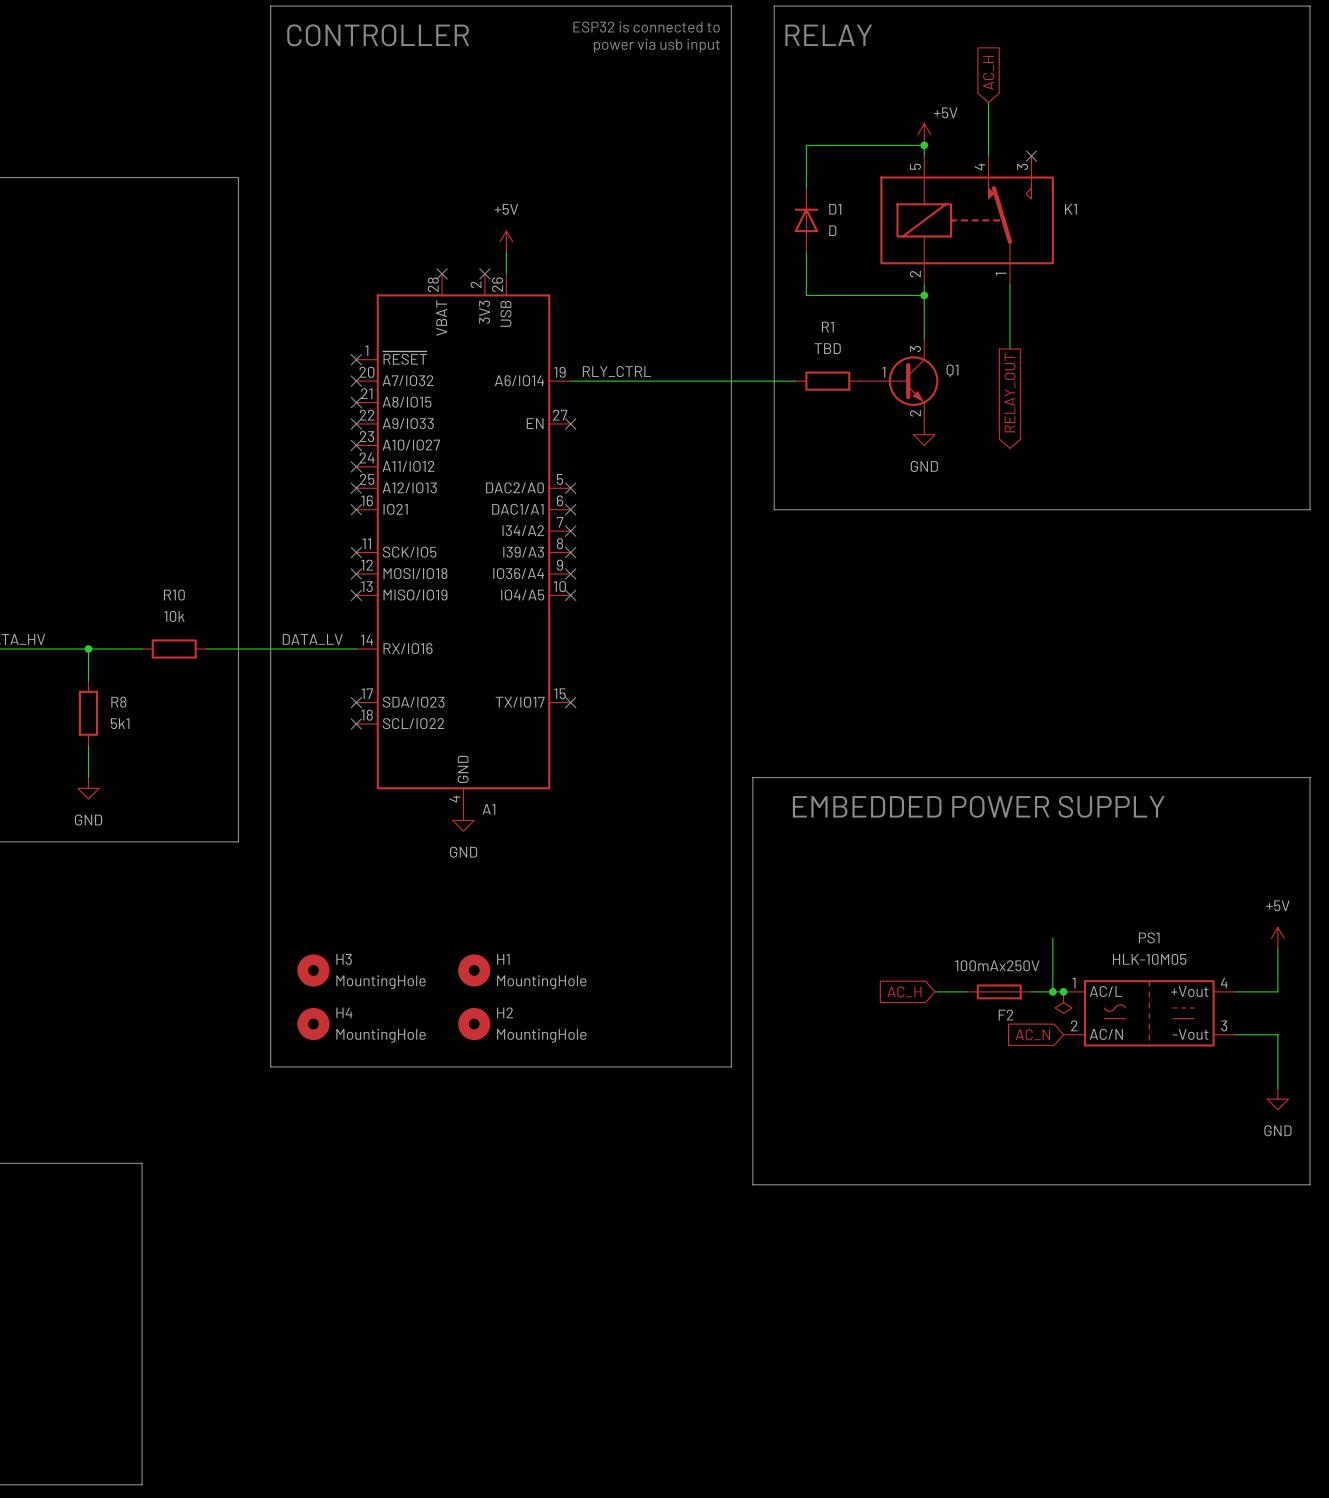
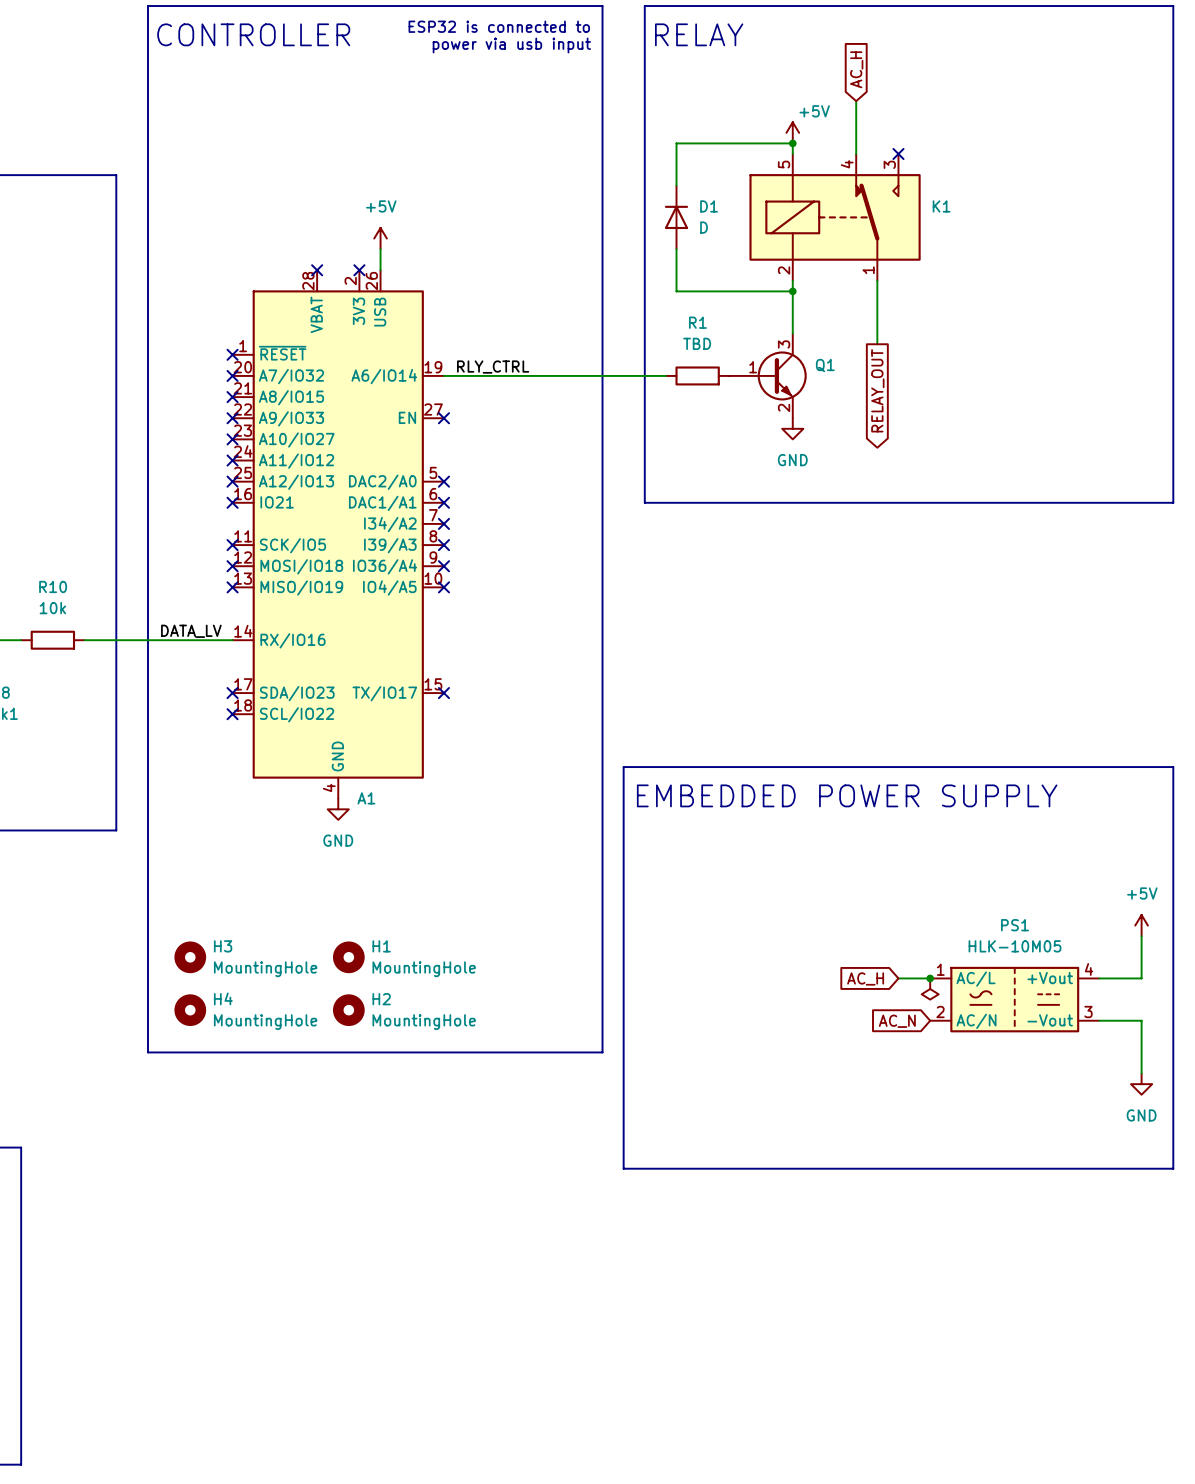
wire: (1052, 938) (1052, 991) -> none
global label position: AC_H (904, 991) -> AC_H (865, 978)
wire: (934, 991) (967, 991) -> none
F2: 100mAx250V (999, 991) -> none
junction: (1052, 991) -> none

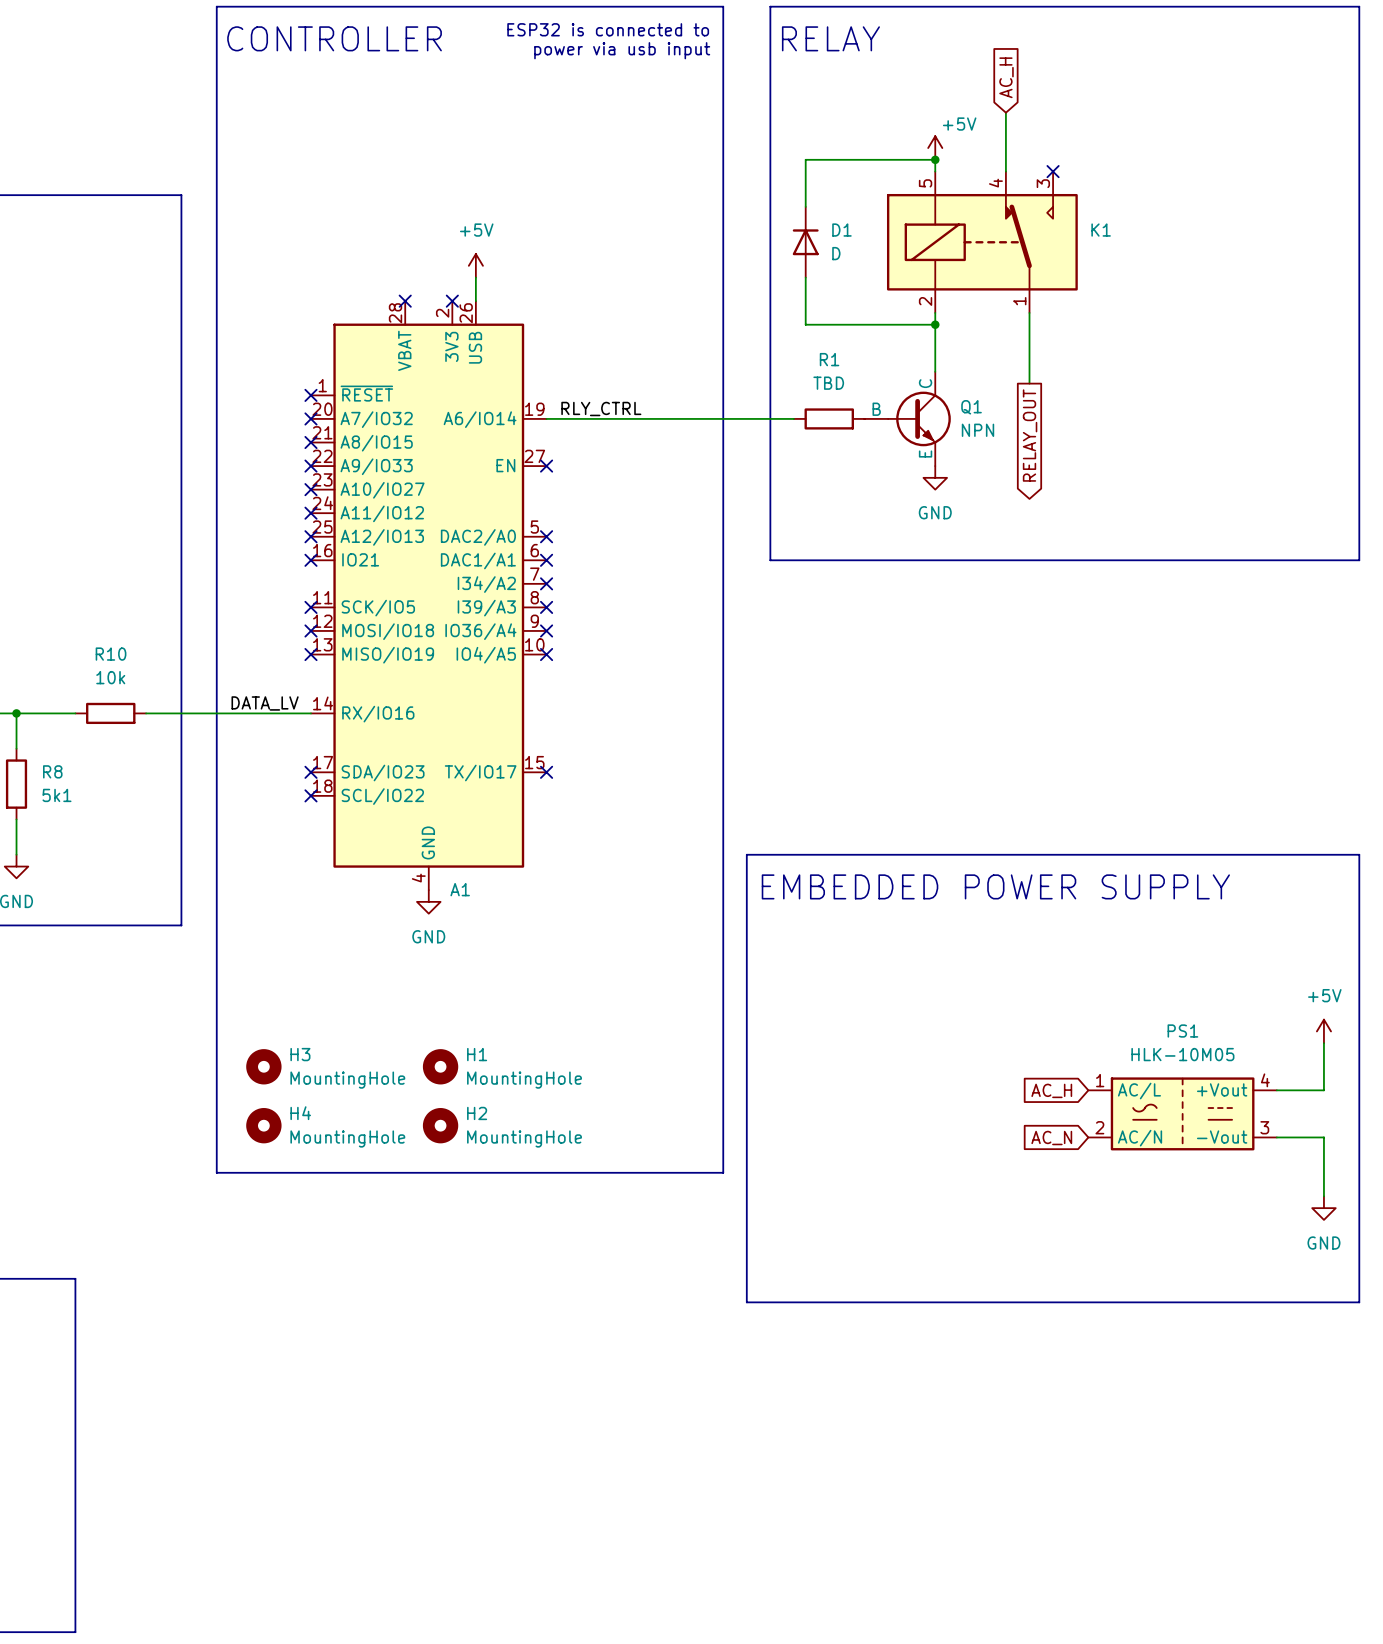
Q1 symbol: [729, 333, 807, 419] -> [864, 371, 951, 467]
Q1 value: none -> NPN (977, 430)
global label position: AC_H (865, 978) -> AC_H (1051, 1090)
wire: (898, 978) (930, 978) -> none
junction: (930, 978) -> none
power symbol: (930, 989) -> none

